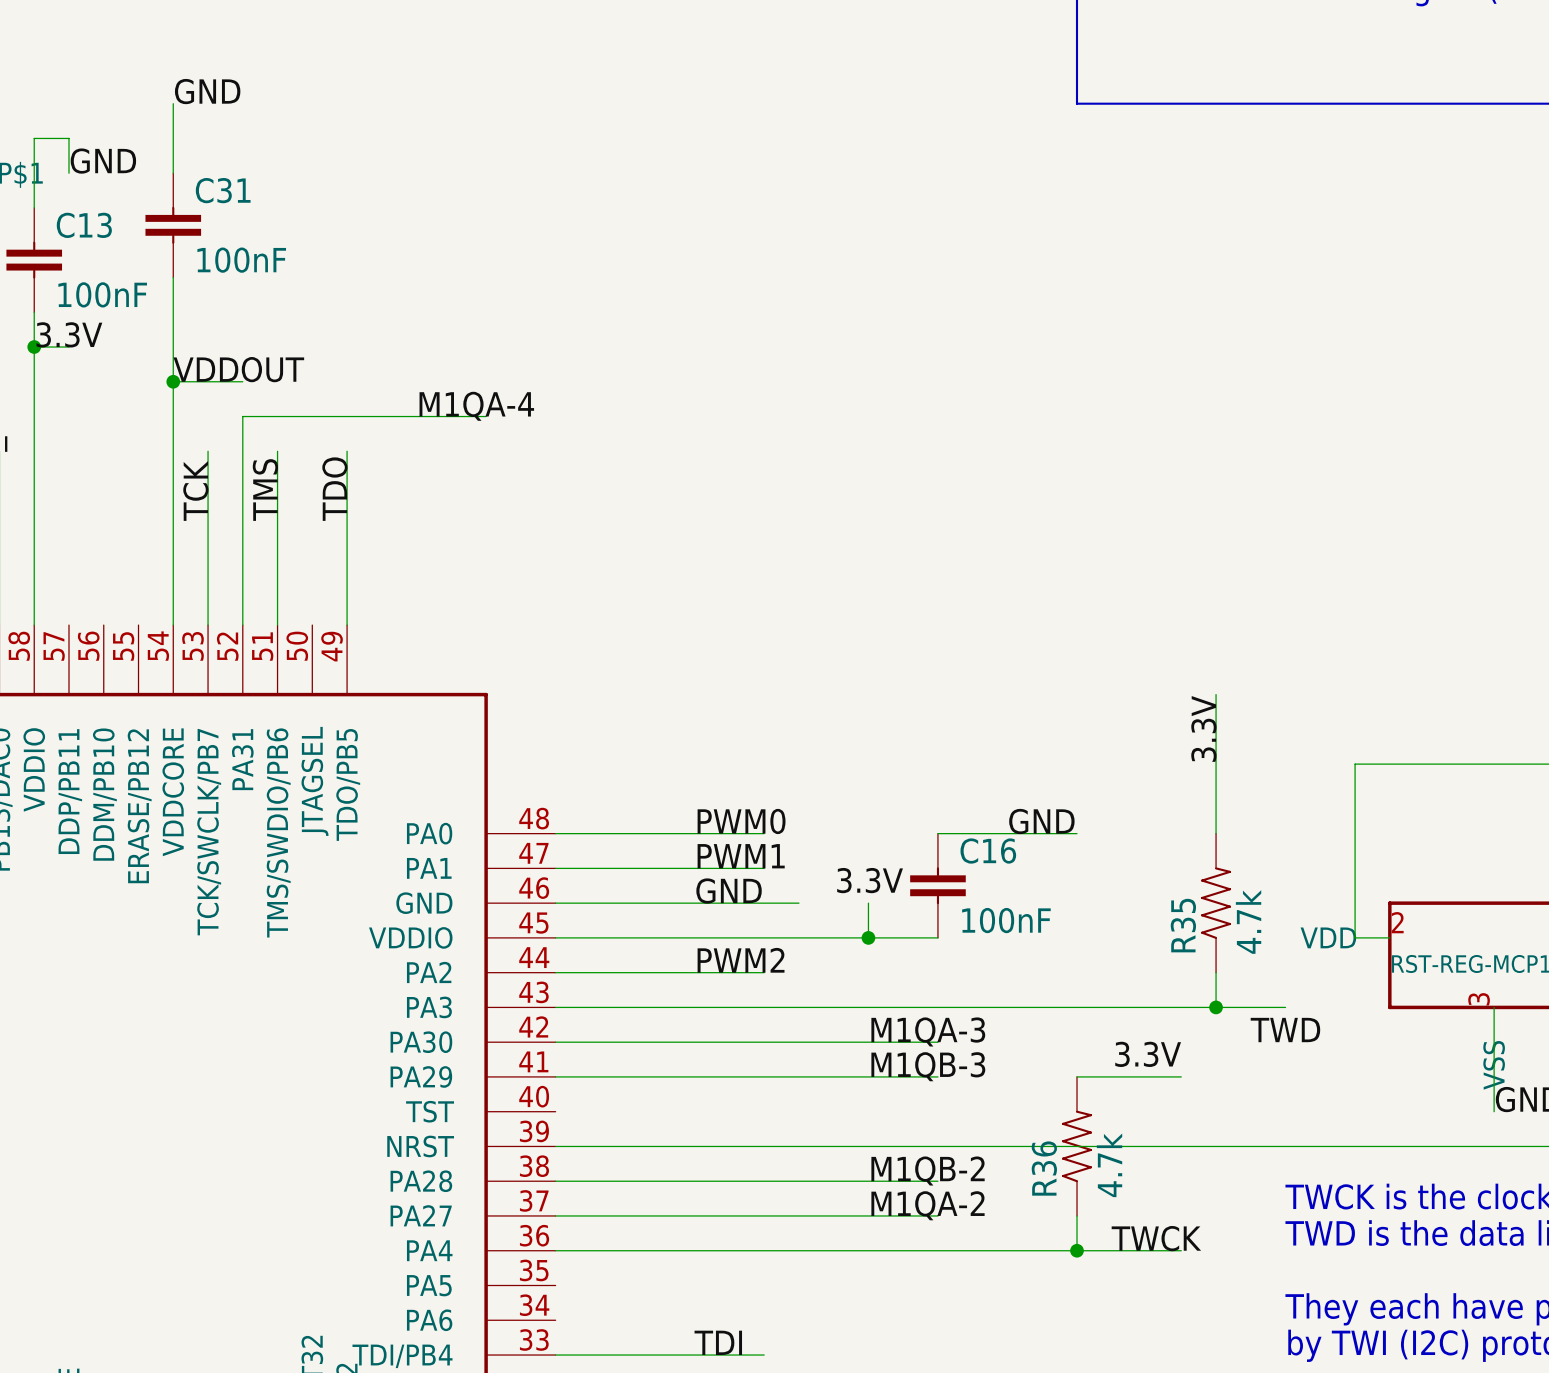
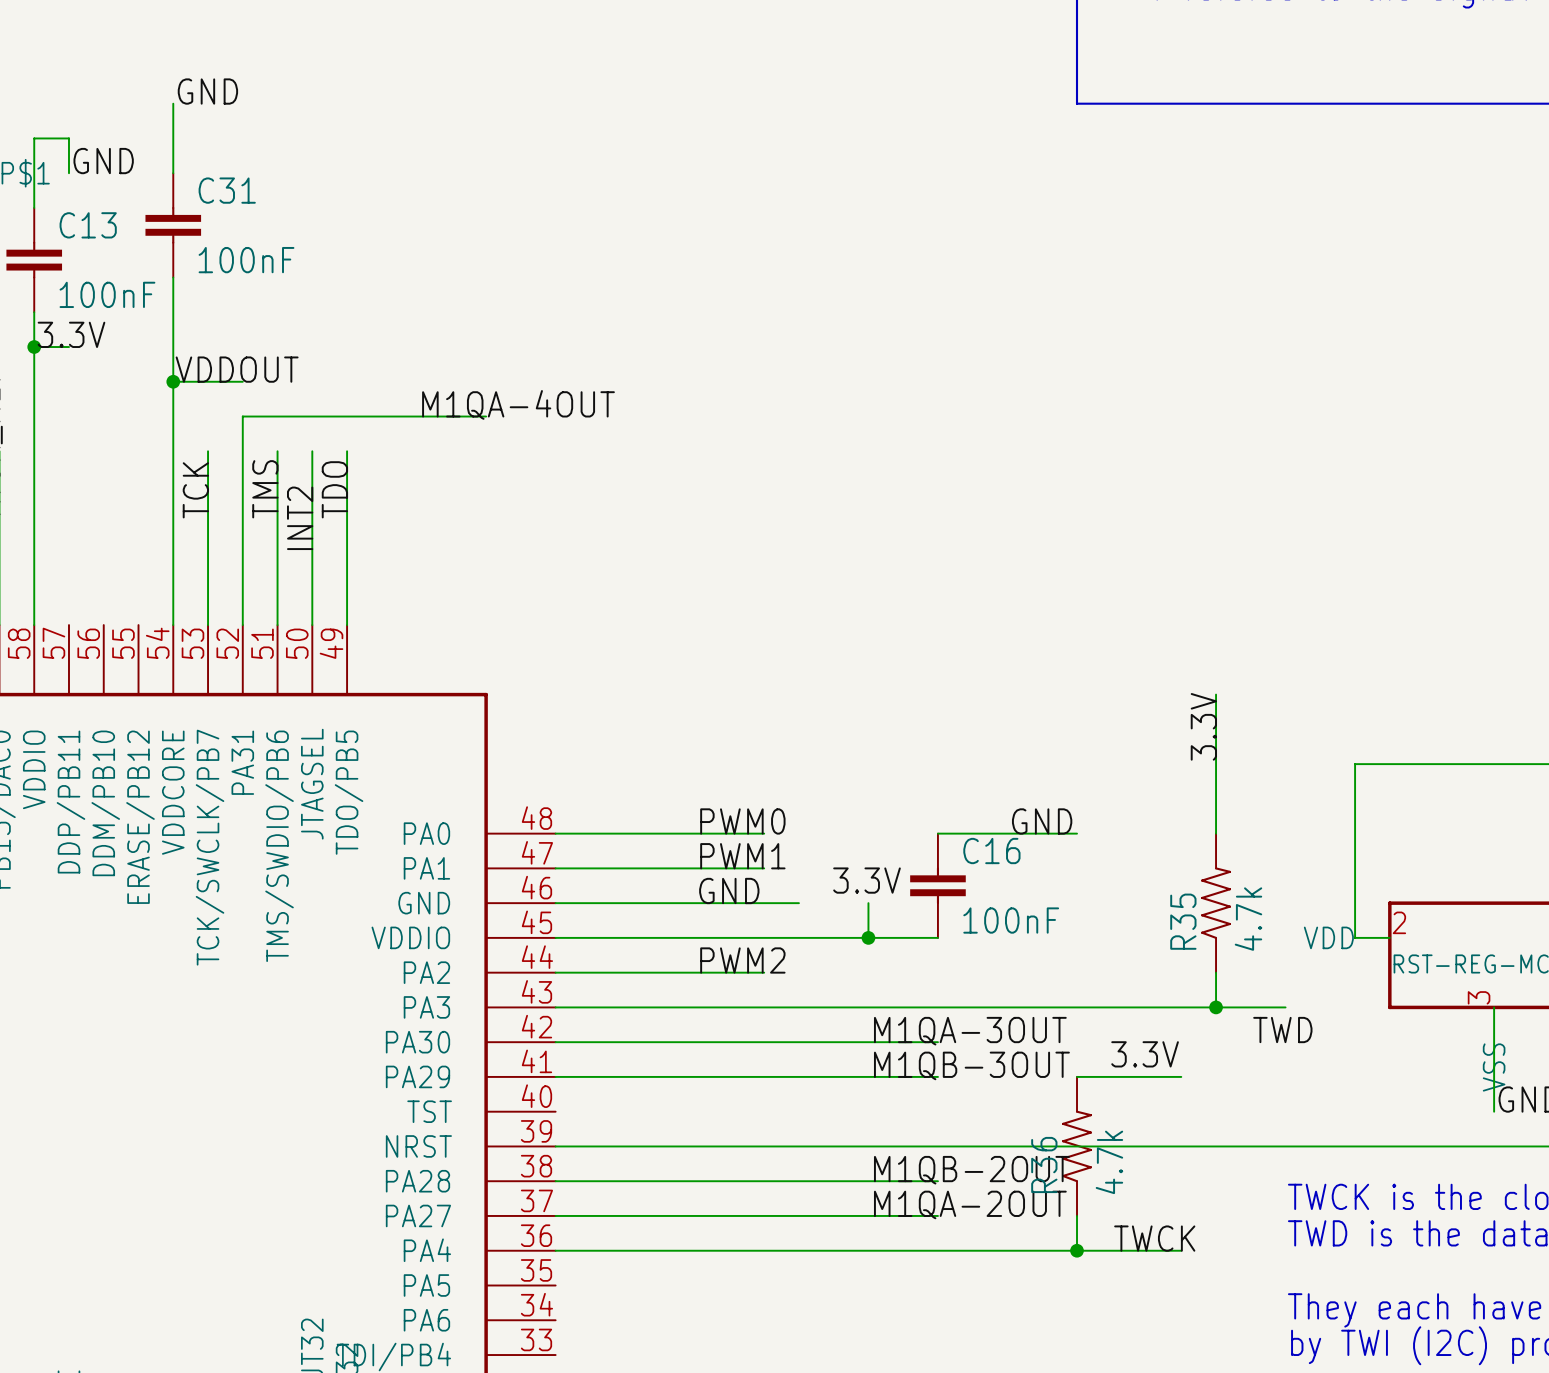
label: M1QA-4 (476, 406) -> M1QA-4OUT (518, 404)
wire: none -> (312, 451) (312, 625)
label: none -> INT2 (300, 518)
label: M1QA-3 (928, 1031) -> M1QA-3OUT (970, 1031)
label: M1QB-3 (928, 1066) -> M1QB-3OUT (971, 1065)
label: M1QB-2 (928, 1170) -> M1QB-2OUT (971, 1170)
label: M1QA-2 (928, 1205) -> M1QA-2OUT (970, 1204)
label: TDI (718, 1342) -> none
wire: (555, 1355) (764, 1355) -> none

